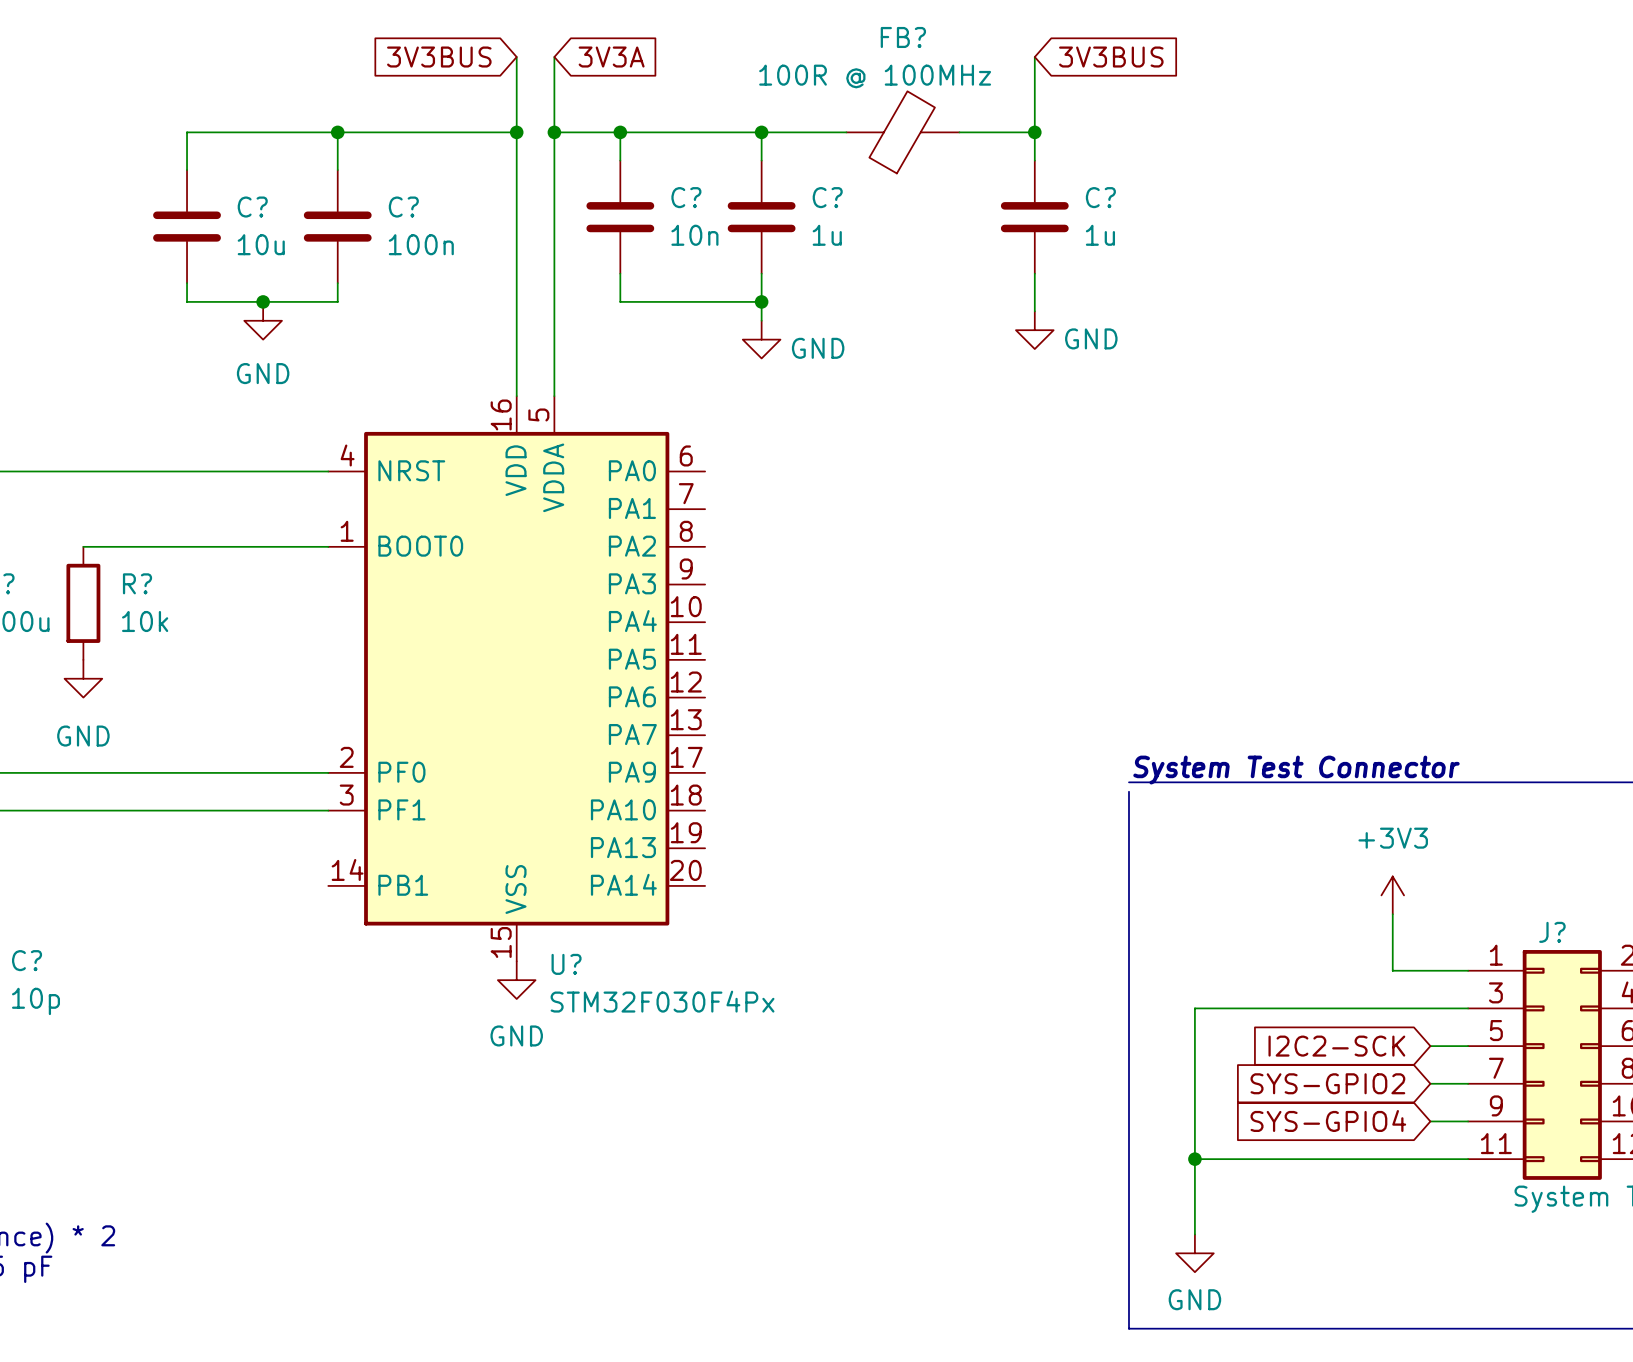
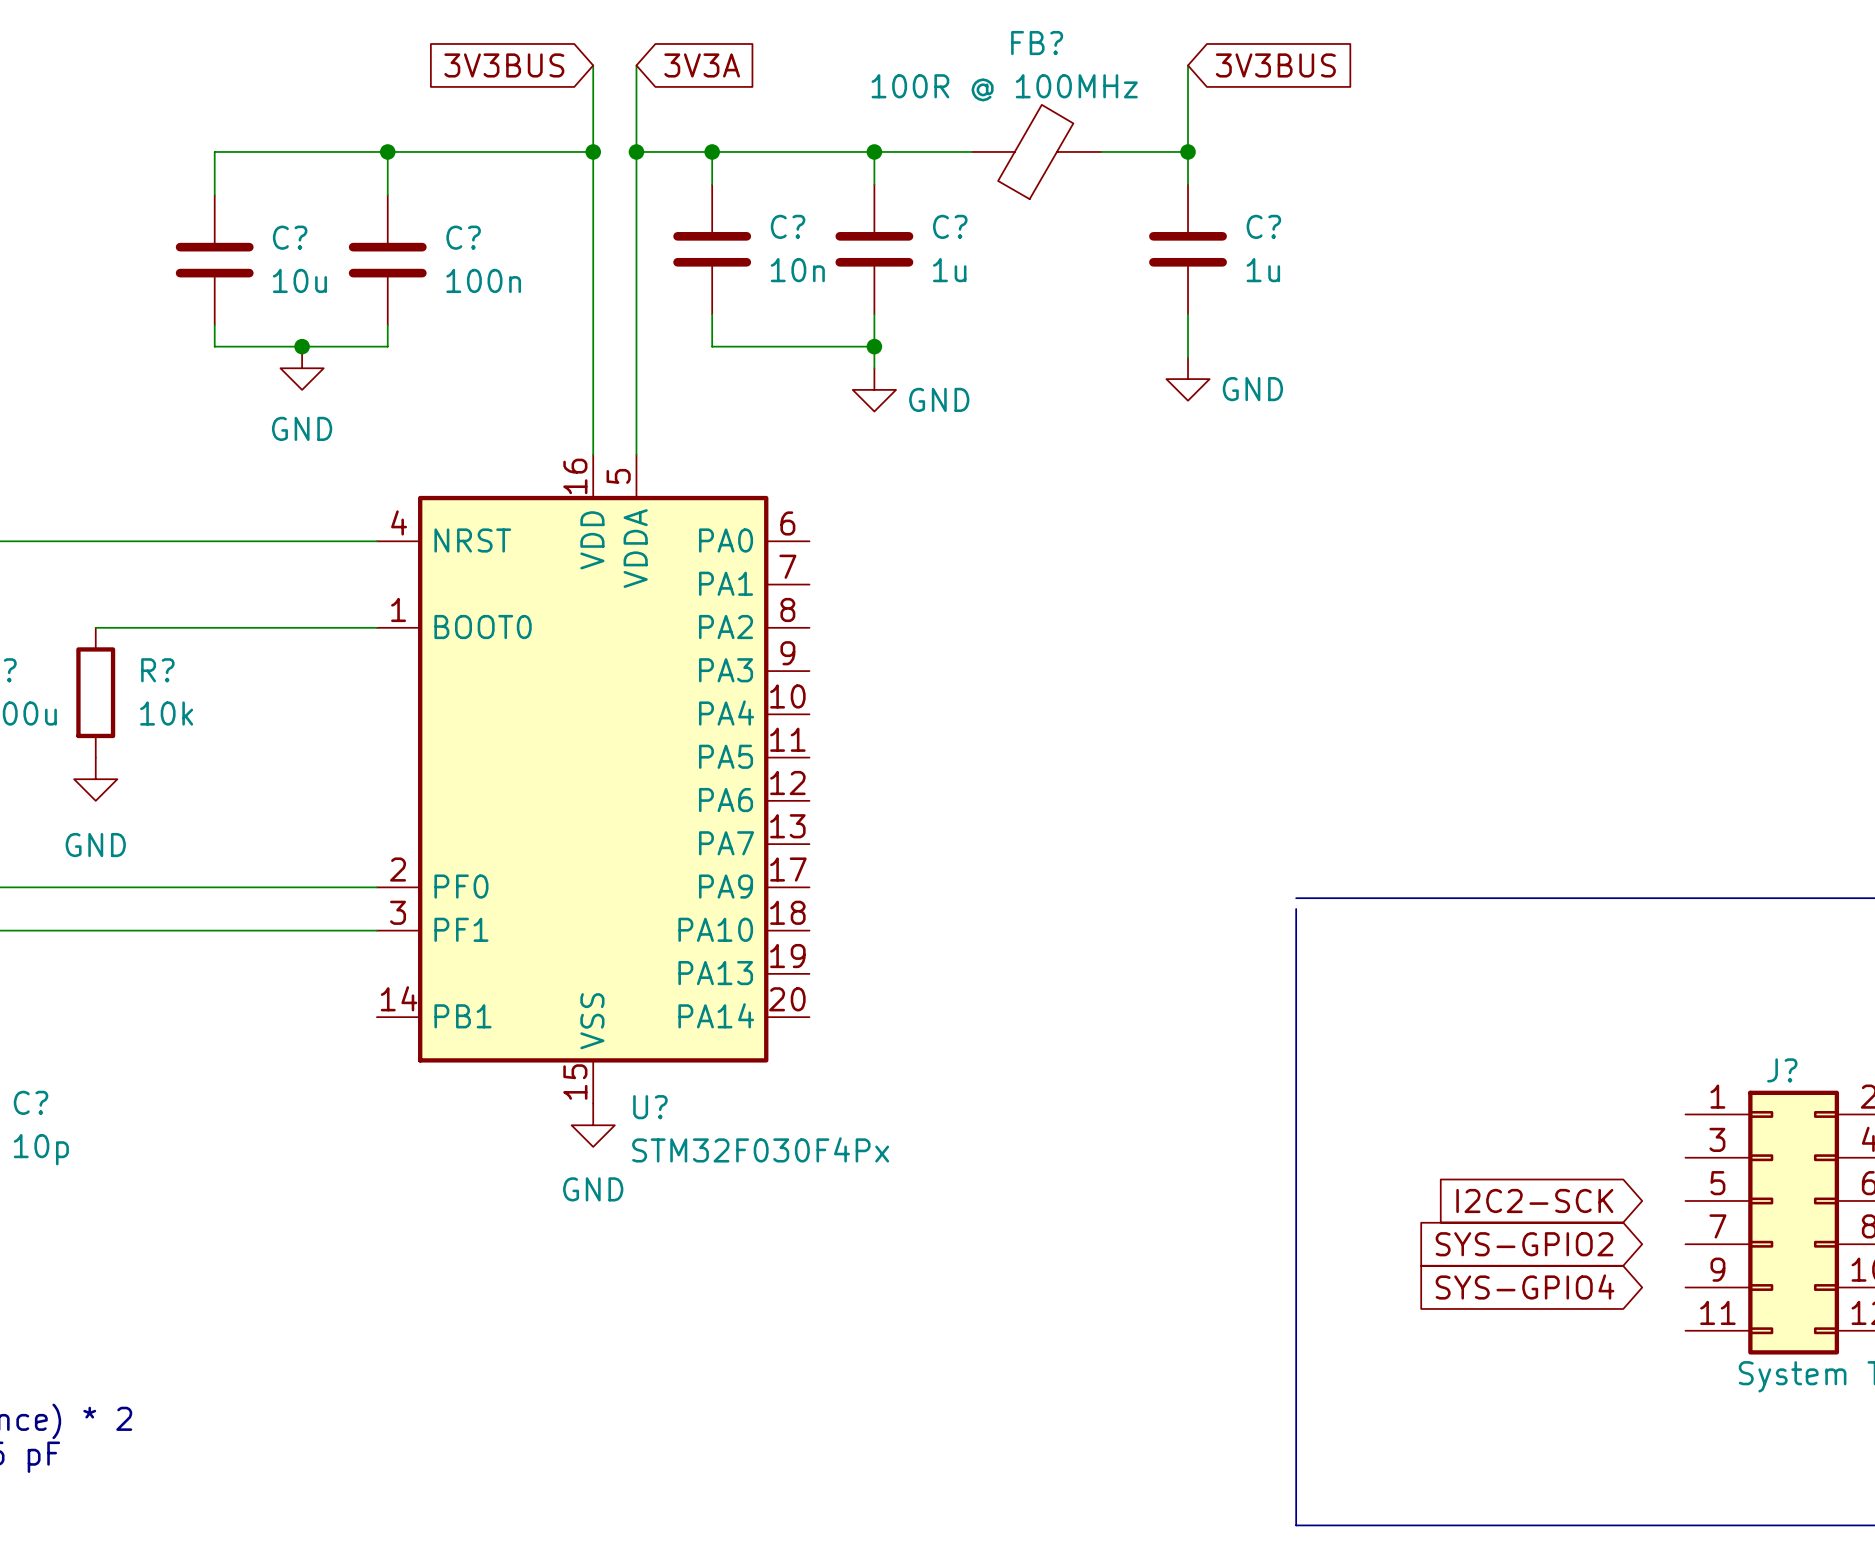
text: System Test Connector (1296, 770) -> none
power symbol: +3V3 (1392, 895) -> none
wire: (1392, 914) (1392, 970) (1468, 970) -> none
wire: (1468, 1008) (1194, 1008) (1194, 1234) -> none
wire: (1430, 1046) (1468, 1046) -> none
wire: (1430, 1083) (1468, 1083) -> none
wire: (1430, 1121) (1468, 1121) -> none
wire: (1194, 1159) (1468, 1159) -> none
junction: (1194, 1159) -> none
power symbol: GND (1194, 1253) -> none

